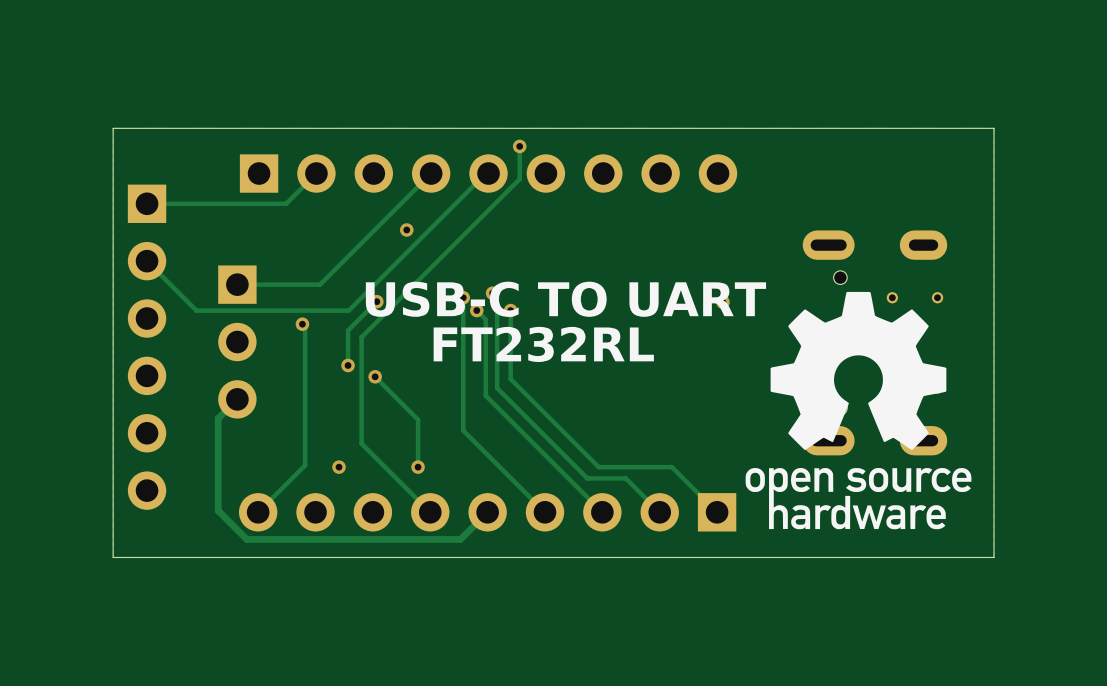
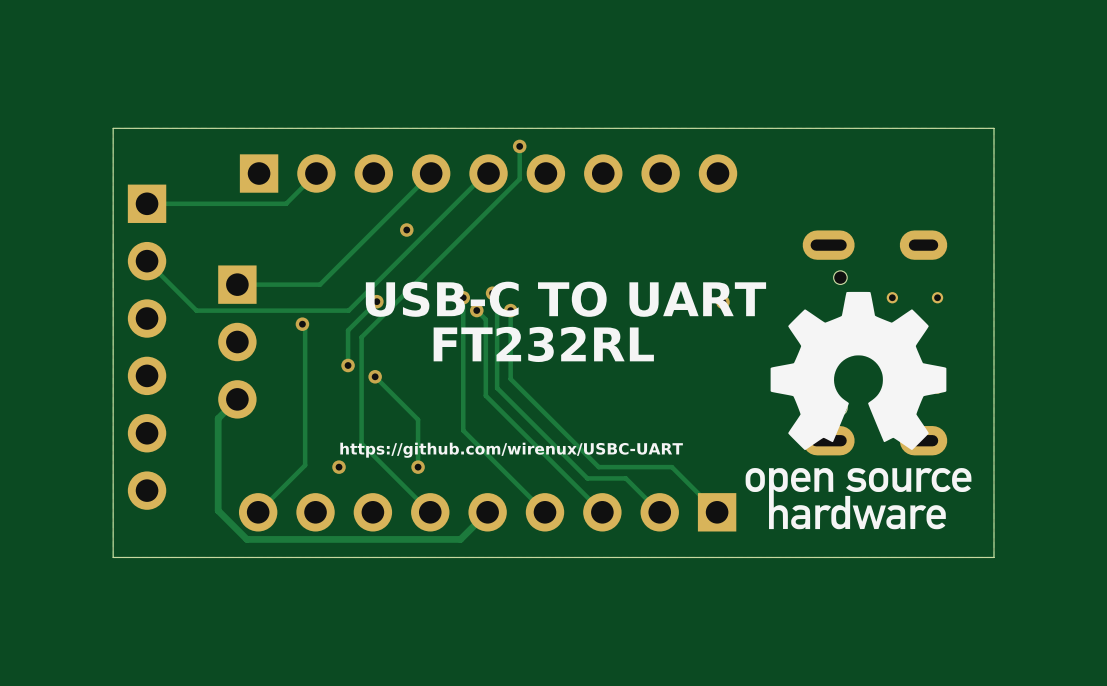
text: none -> https://github.com/wirenux/USBC-UART (511, 450)

